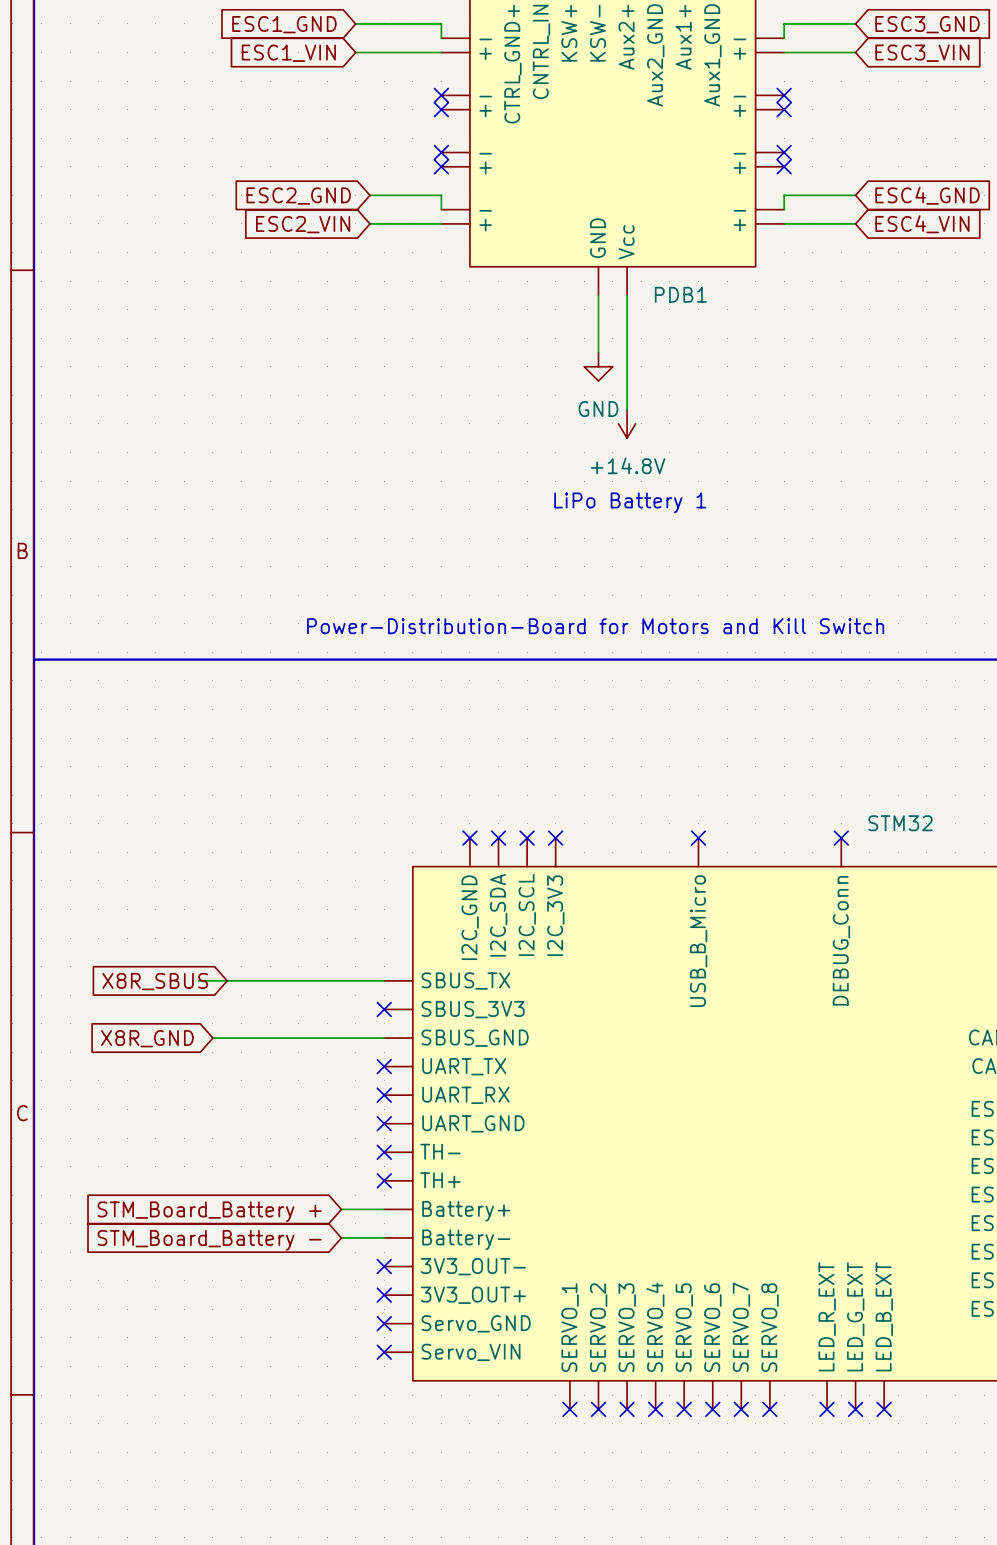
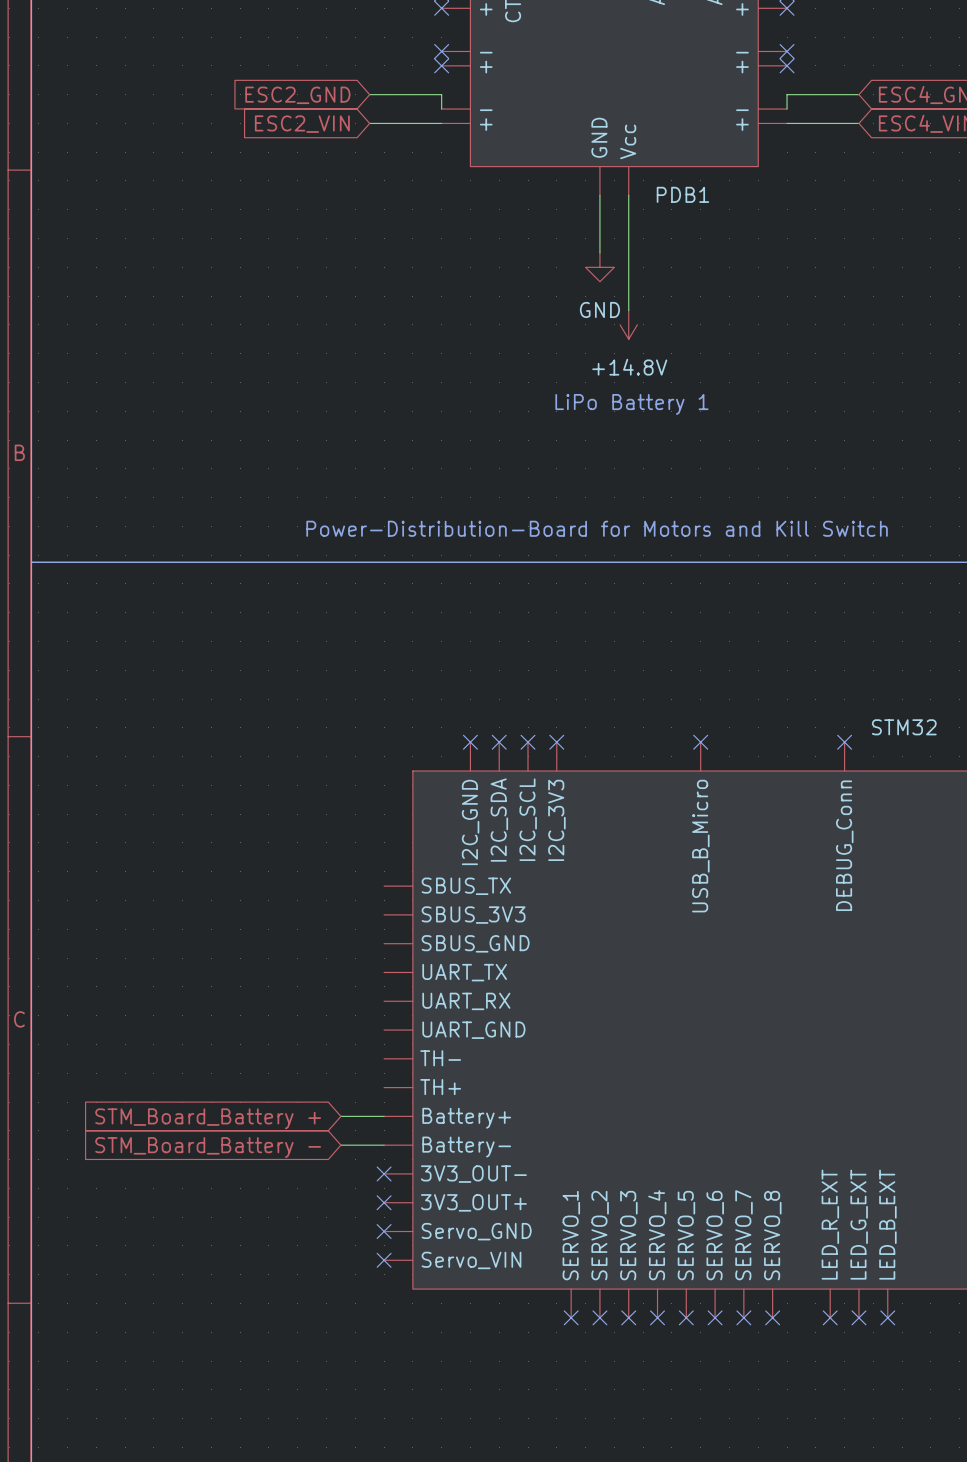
wire: (198, 980) (384, 980) -> none
global label: X8R_SBUS (155, 981) -> none
no-connect mark: (384, 1009) -> none
global label: X8R_GND (147, 1038) -> none
wire: (212, 1038) (384, 1038) -> none
no-connect mark: (384, 1066) -> none
no-connect mark: (384, 1095) -> none
no-connect mark: (384, 1123) -> none
no-connect mark: (384, 1152) -> none
no-connect mark: (384, 1180) -> none

